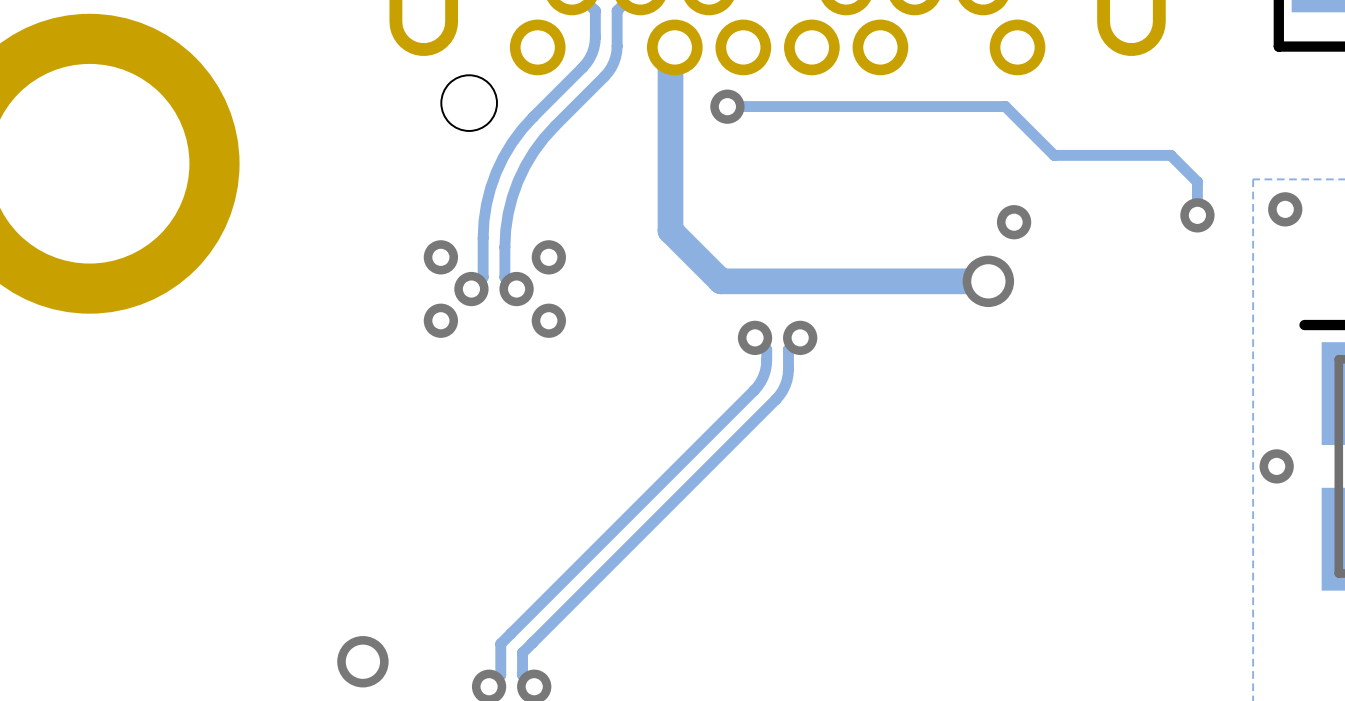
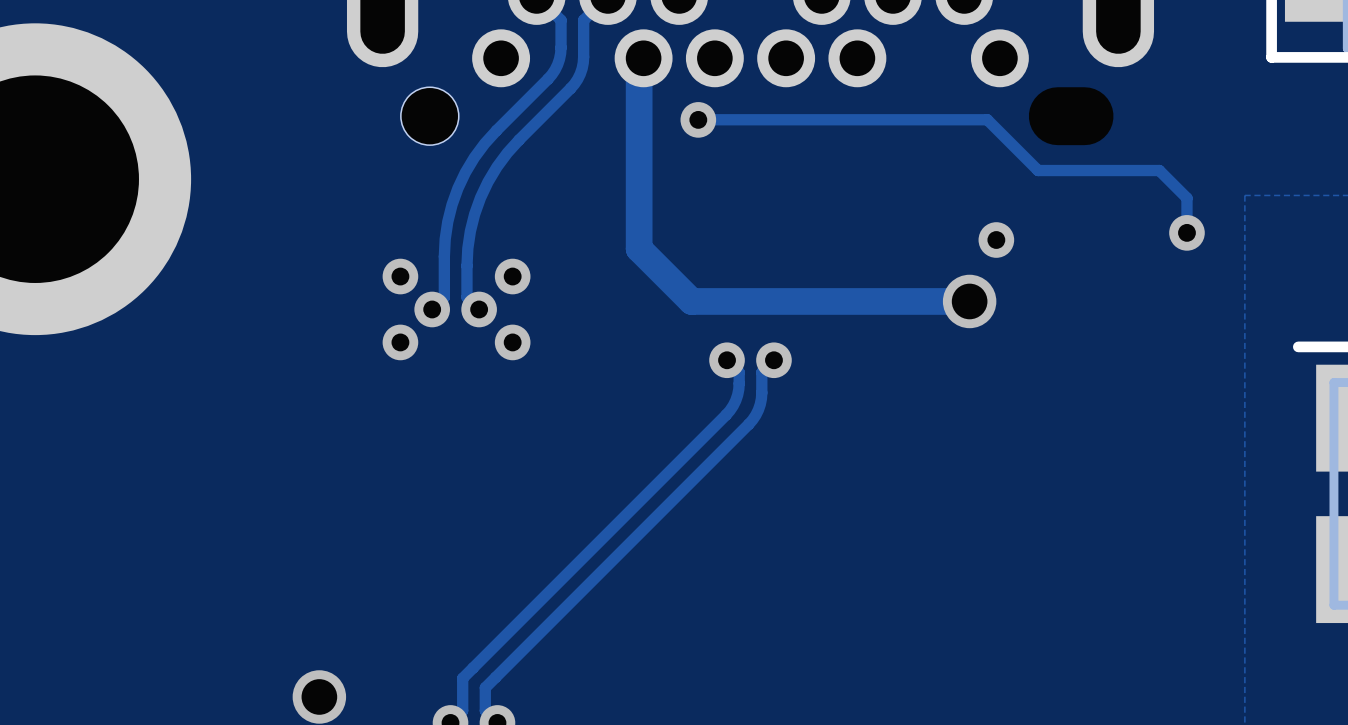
via: (1285, 209) -> none
via: (1276, 466) -> none

